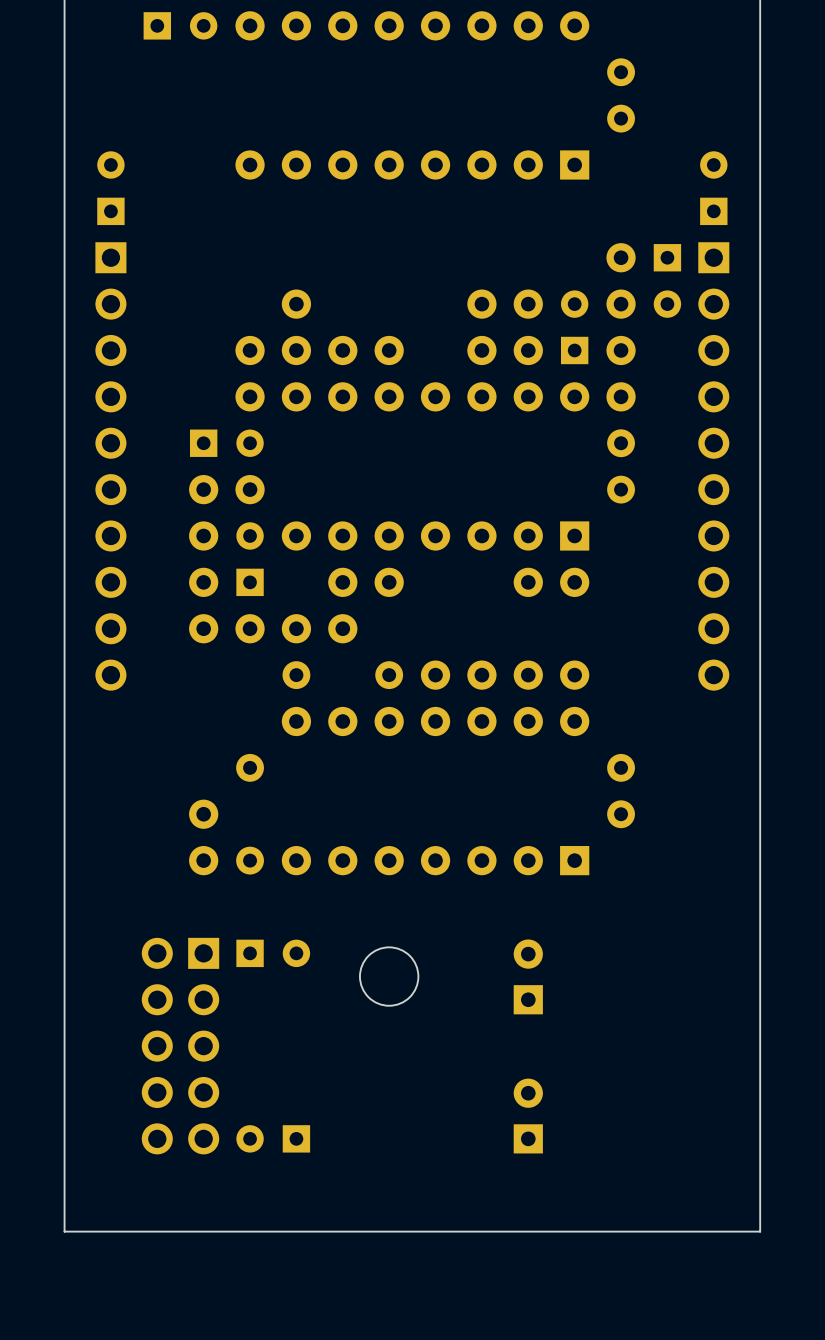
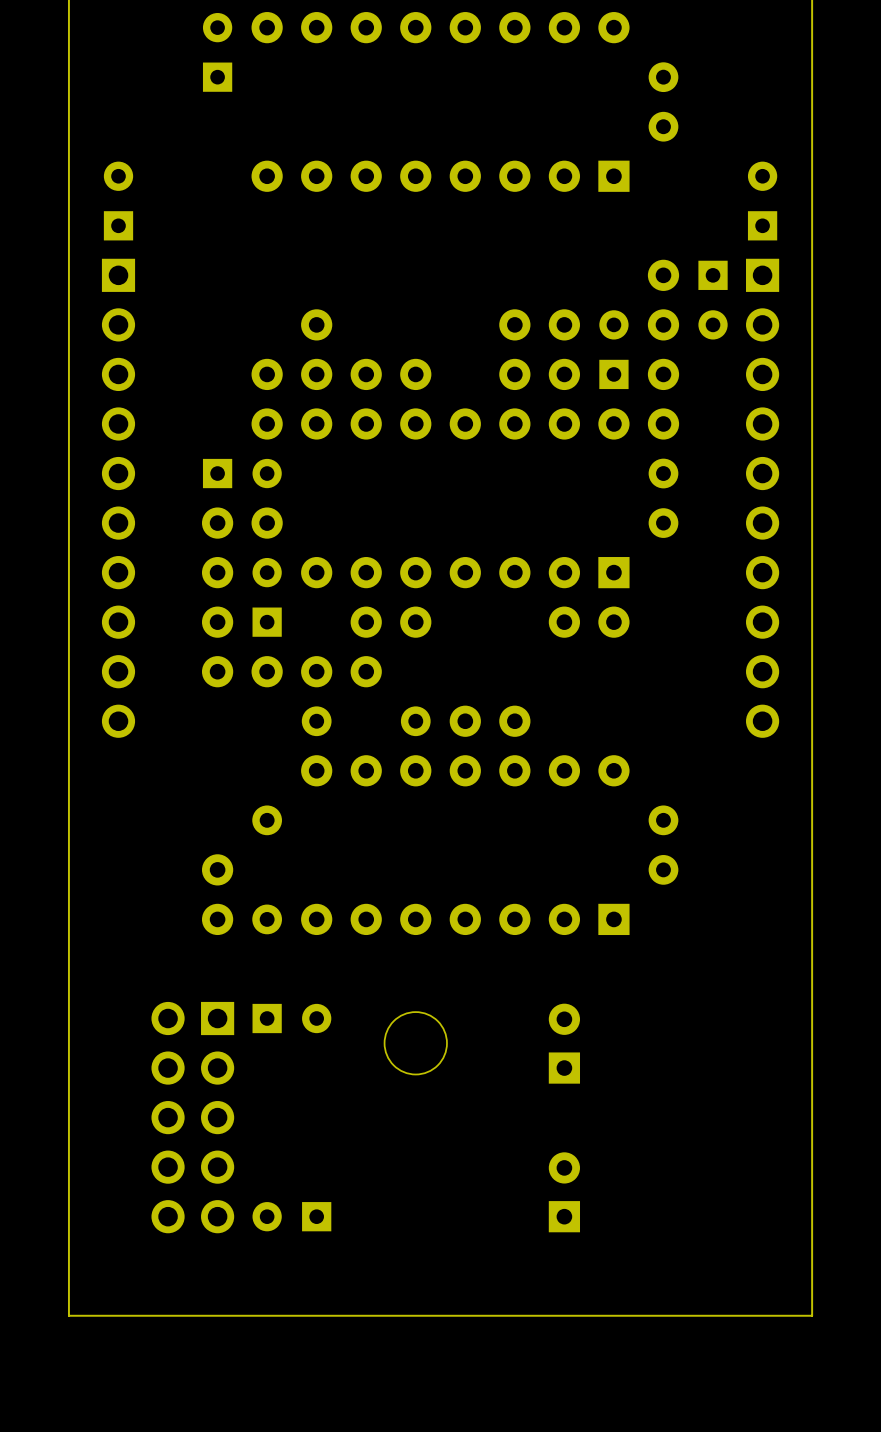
part rotation: 0° (180, 25) -> 90° counterclockwise (217, 52)
part: (551, 675) -> none

